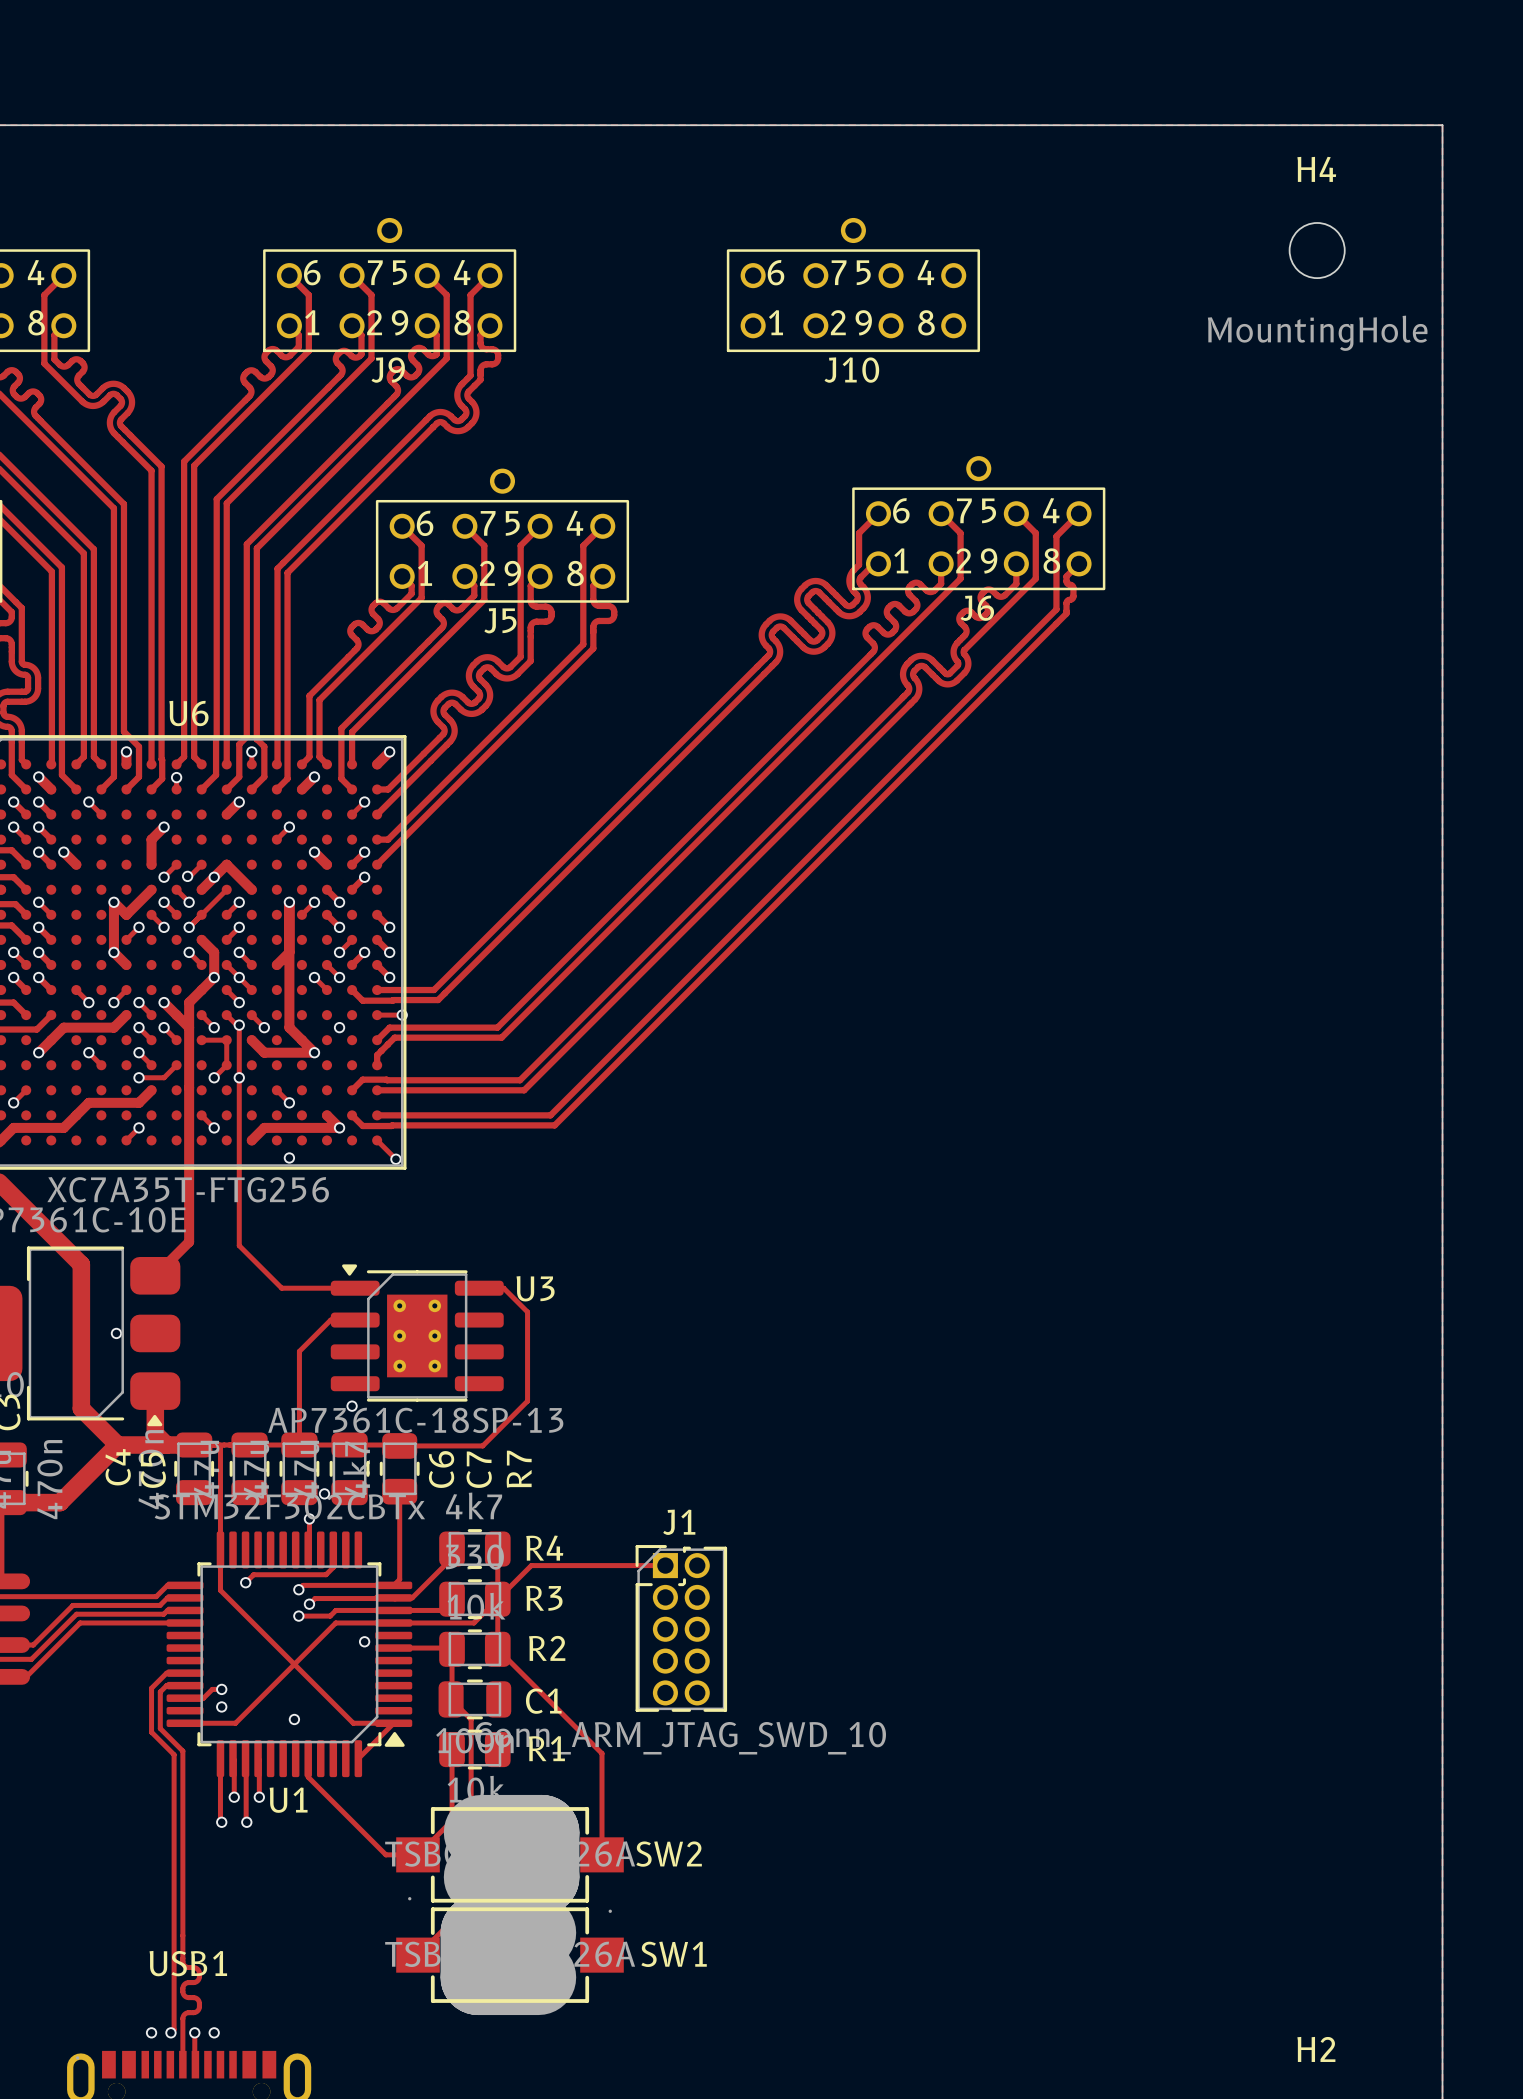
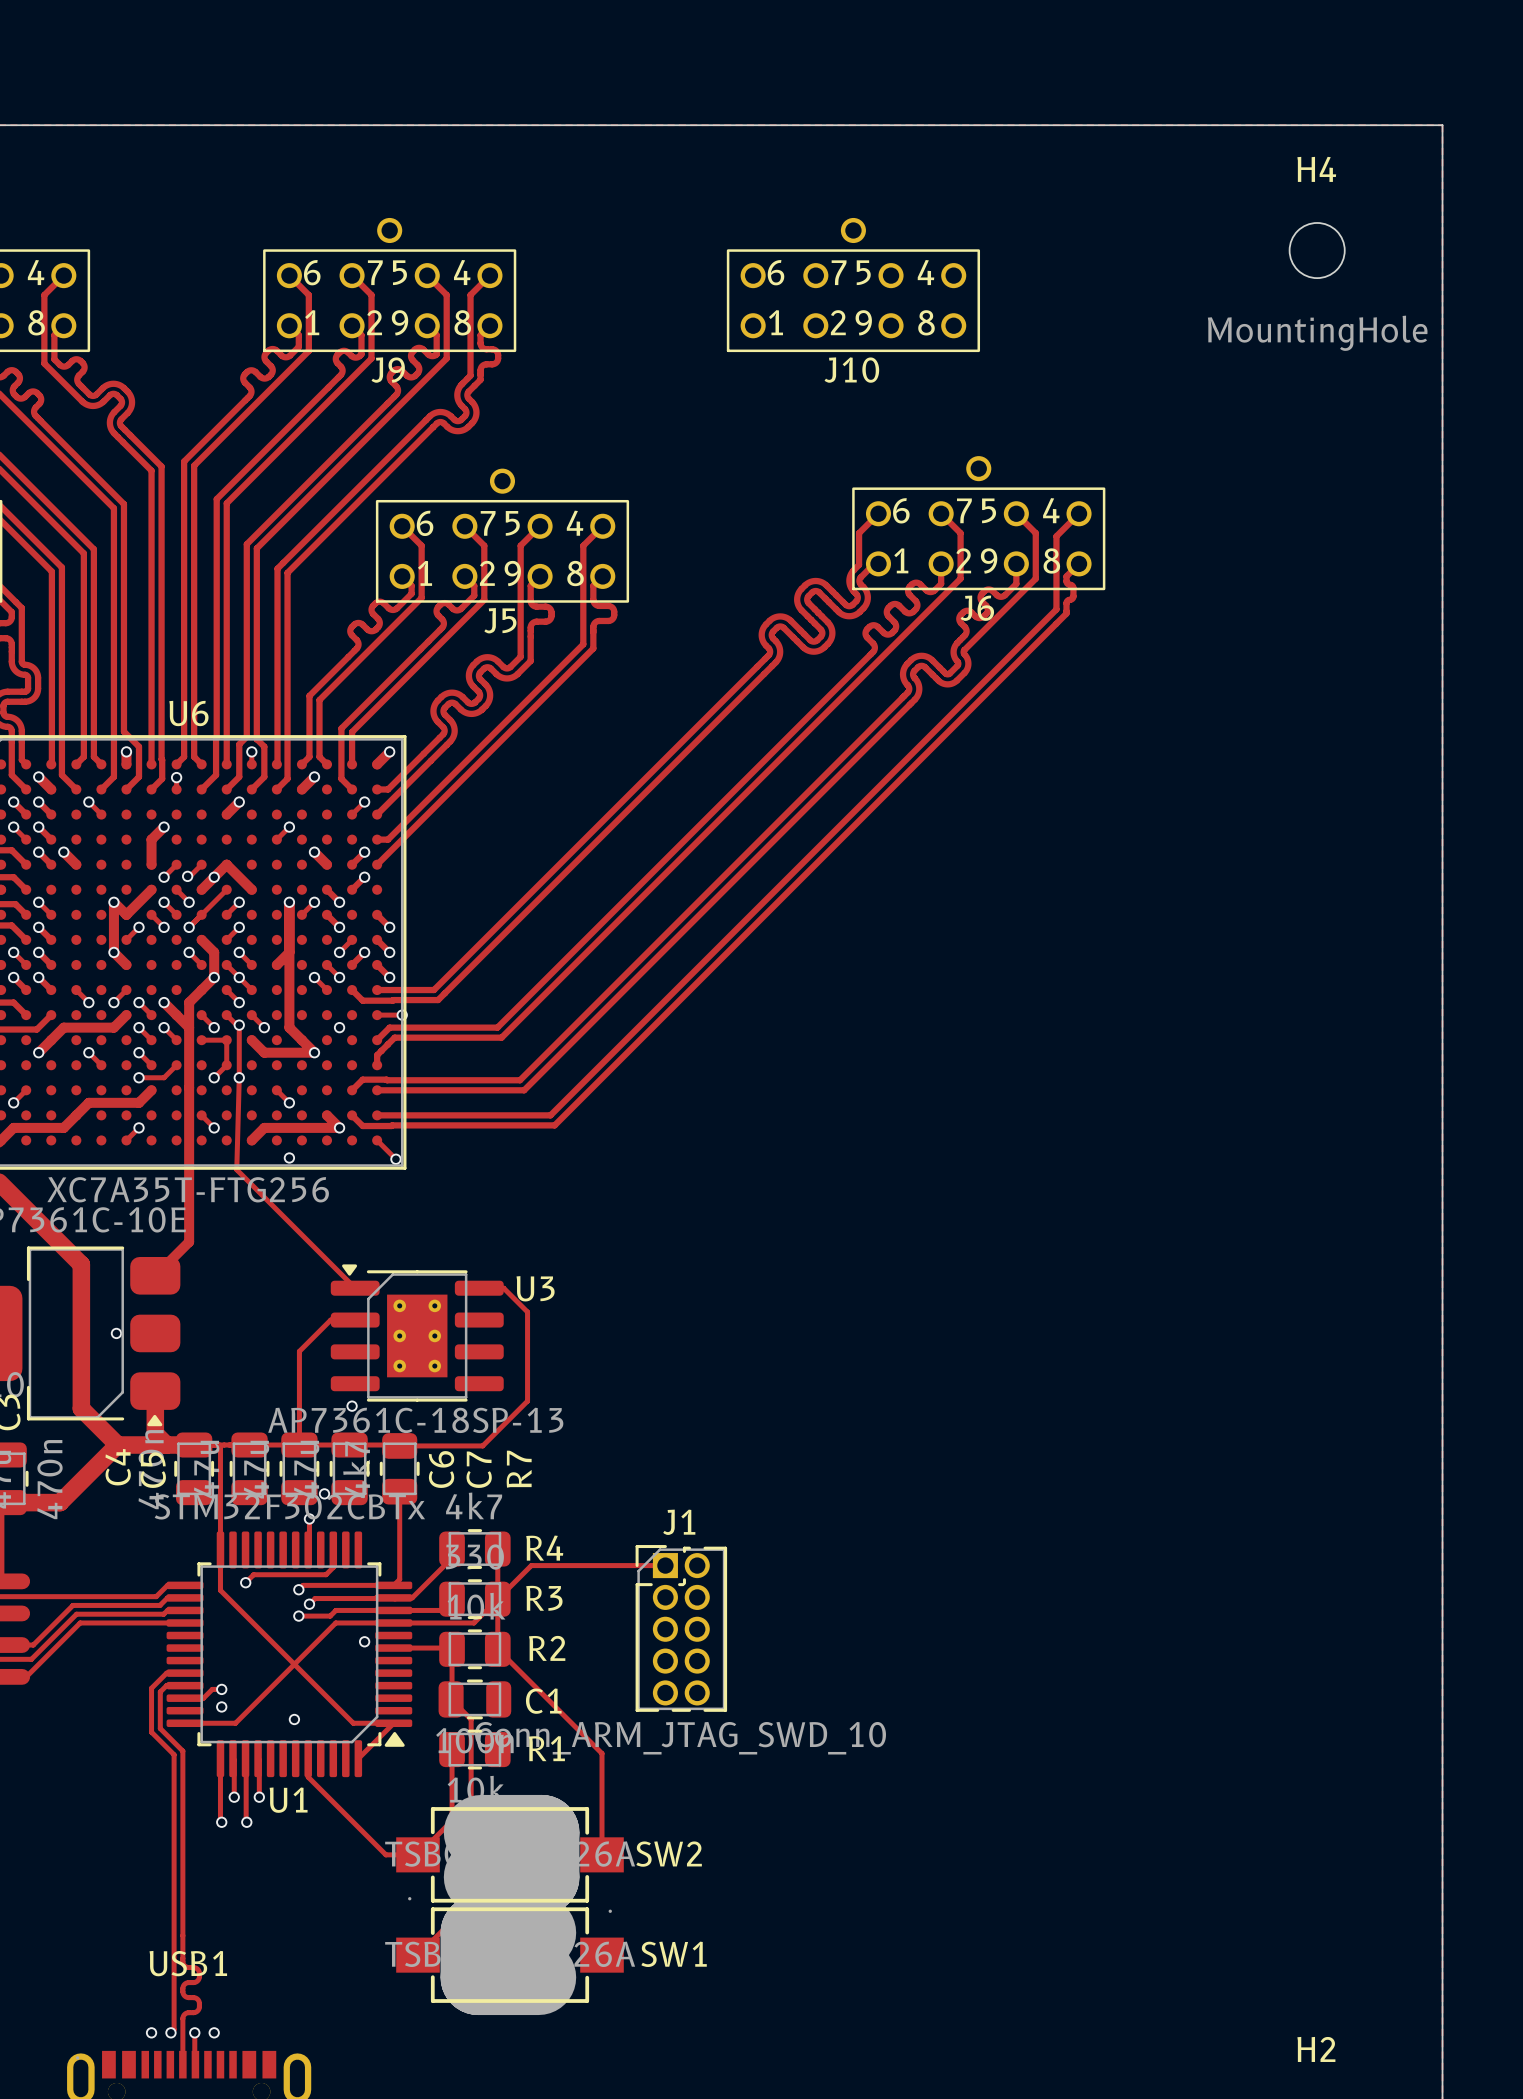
track: (239, 1077) (239, 1245) (281, 1288) (355, 1288) -> (239, 1077) (236, 1169) (355, 1288)

